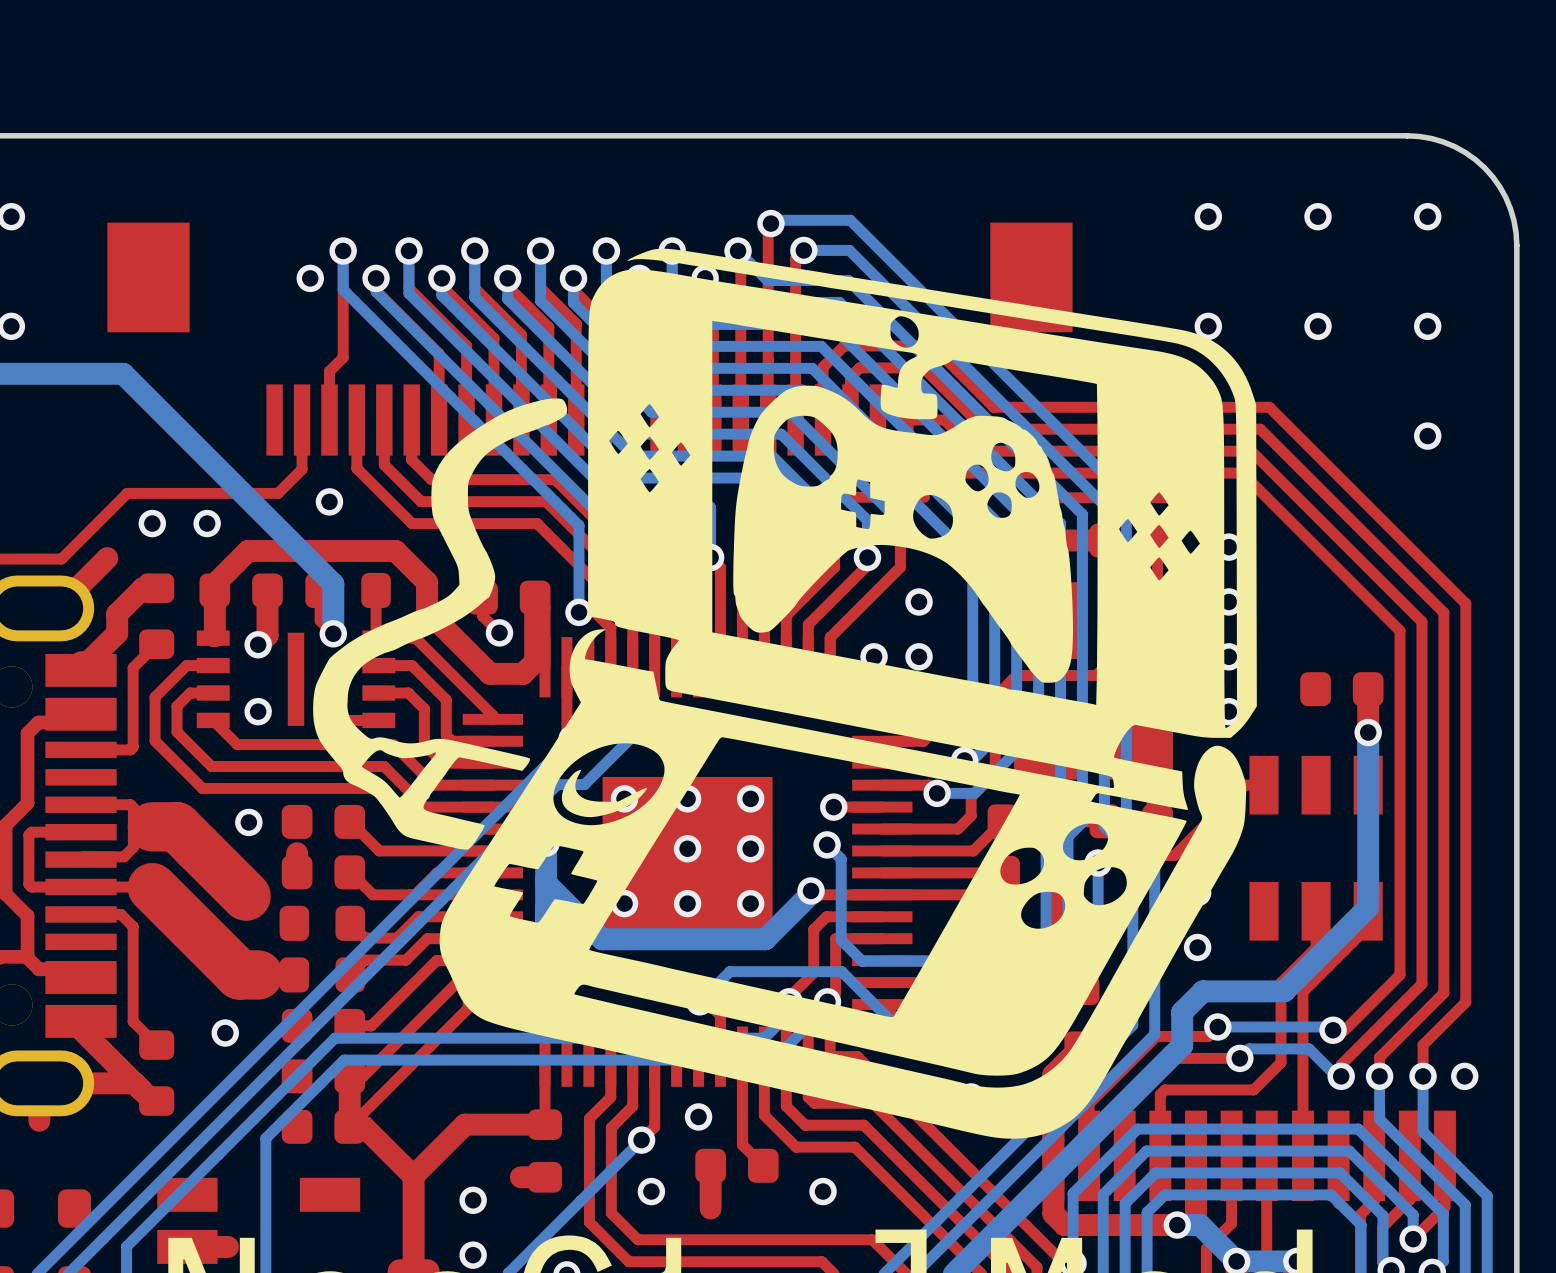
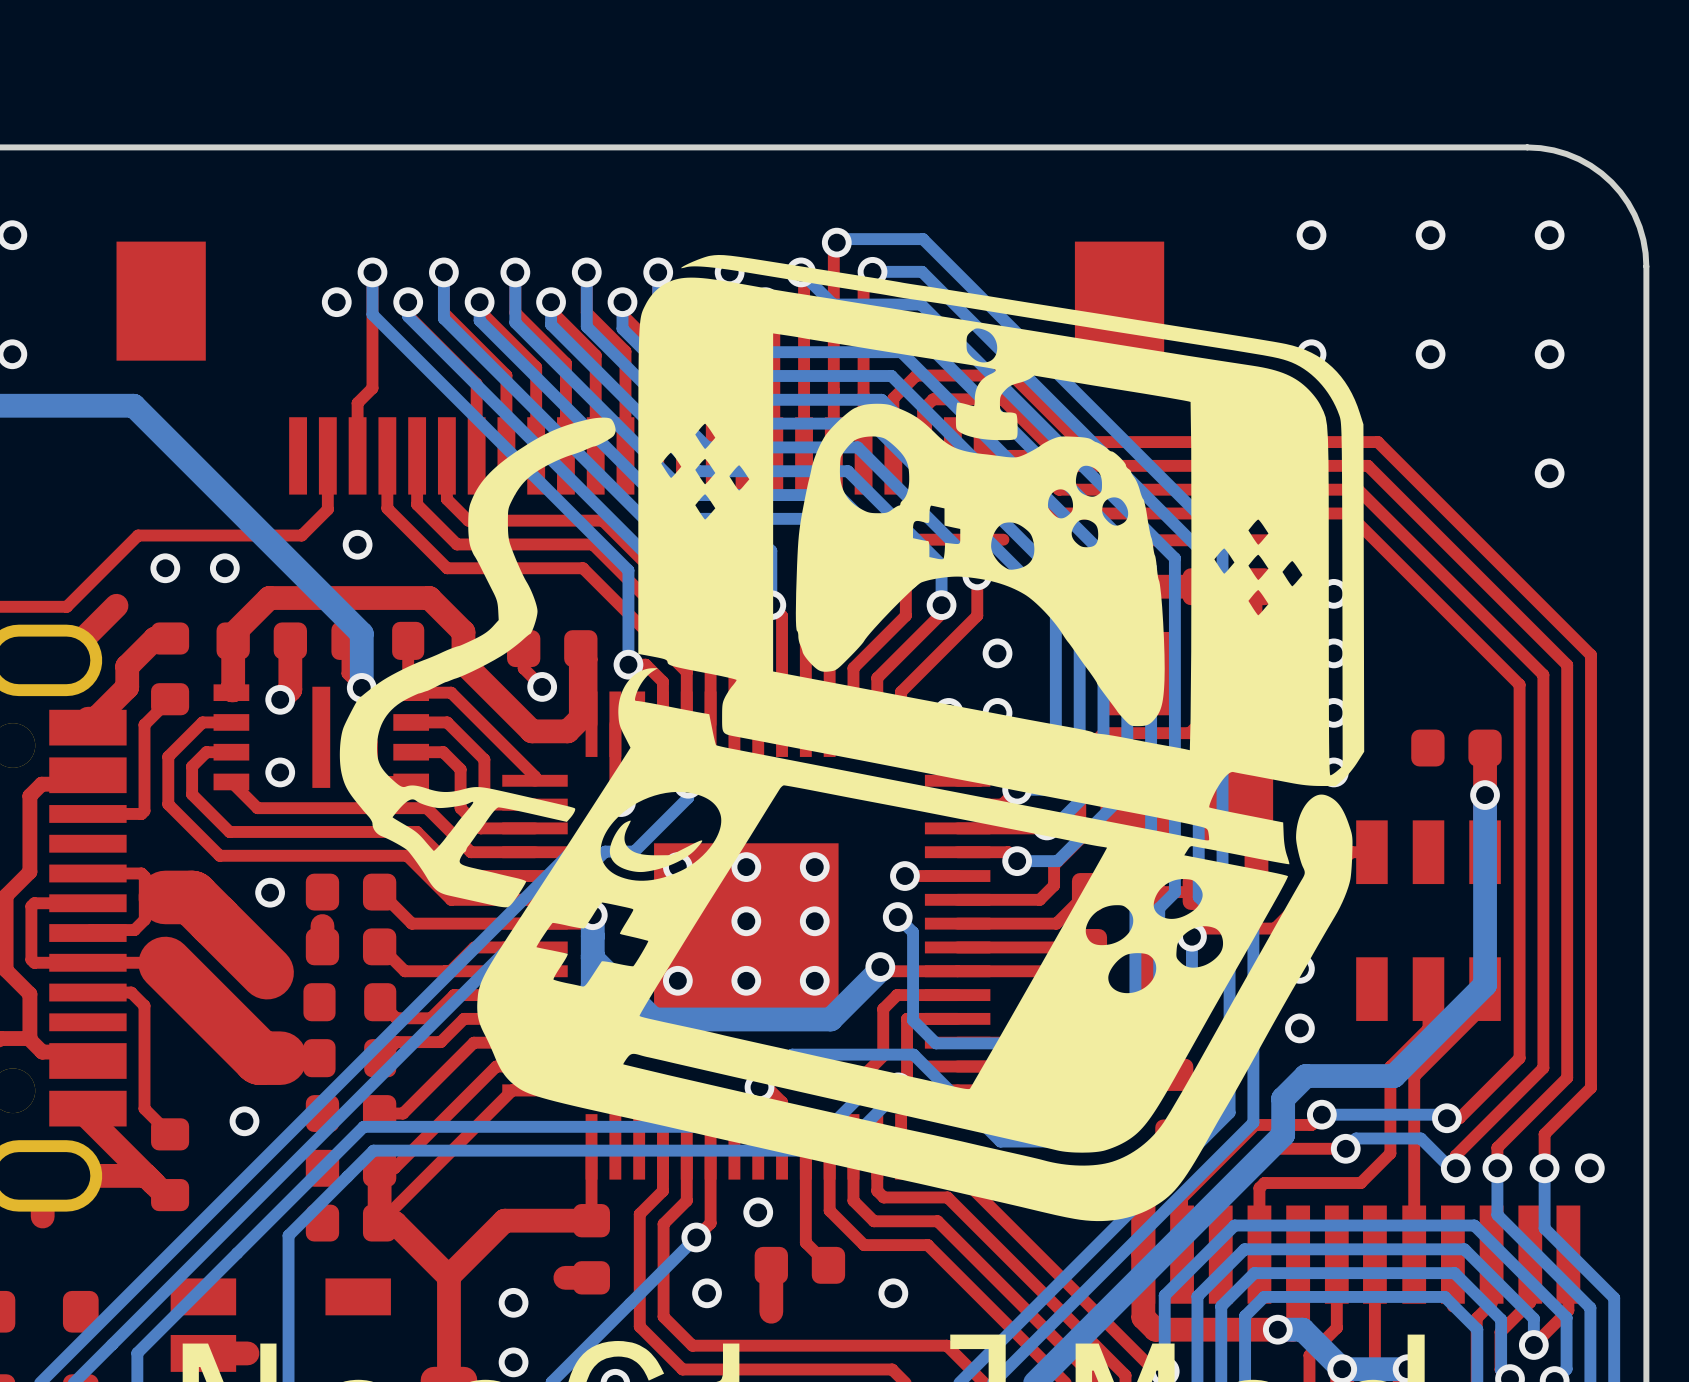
drawing position: (903, 534) -> (980, 564)
drawing position: (440, 624) -> (477, 662)
drawing position: (848, 693) -> (920, 738)
drawing position: (604, 793) -> (656, 846)

